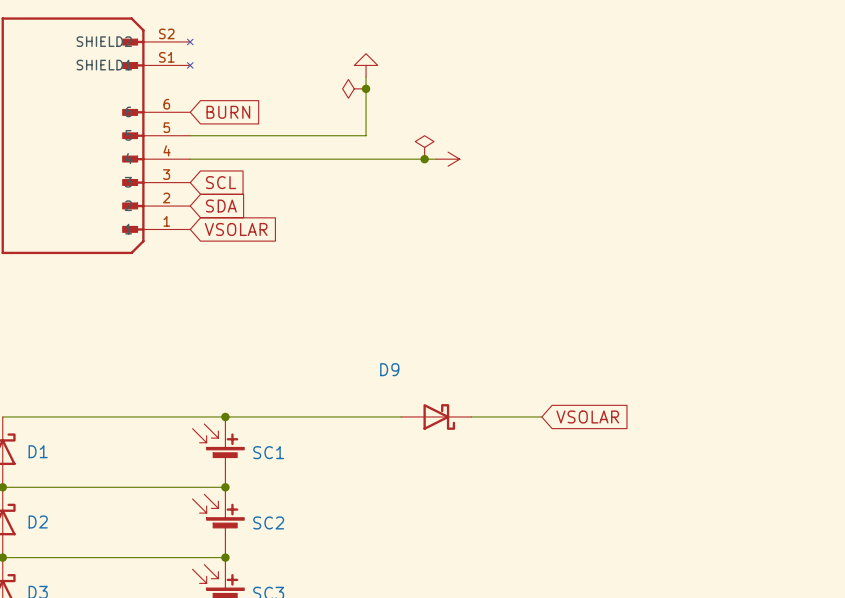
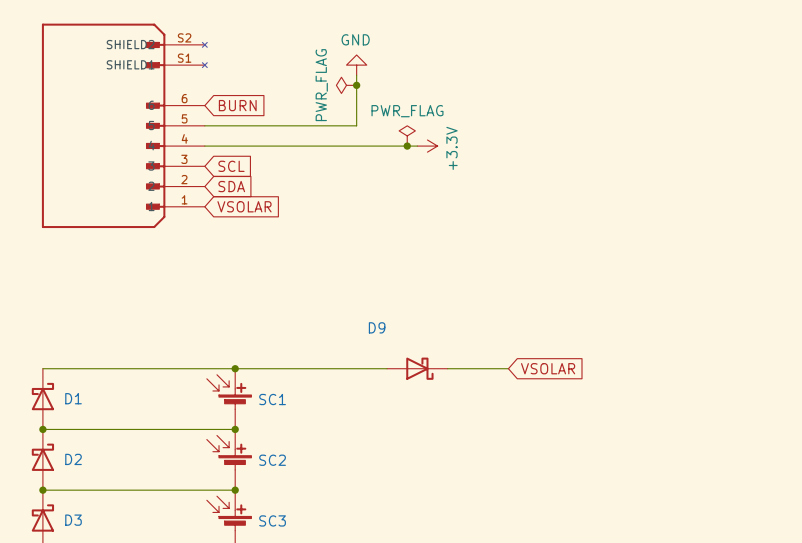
power symbol text: none -> GND (355, 39)
power symbol text: none -> PWR_FLAG (321, 85)
power symbol text: none -> PWR_FLAG (407, 111)
power symbol text: none -> +3.3V (452, 148)

